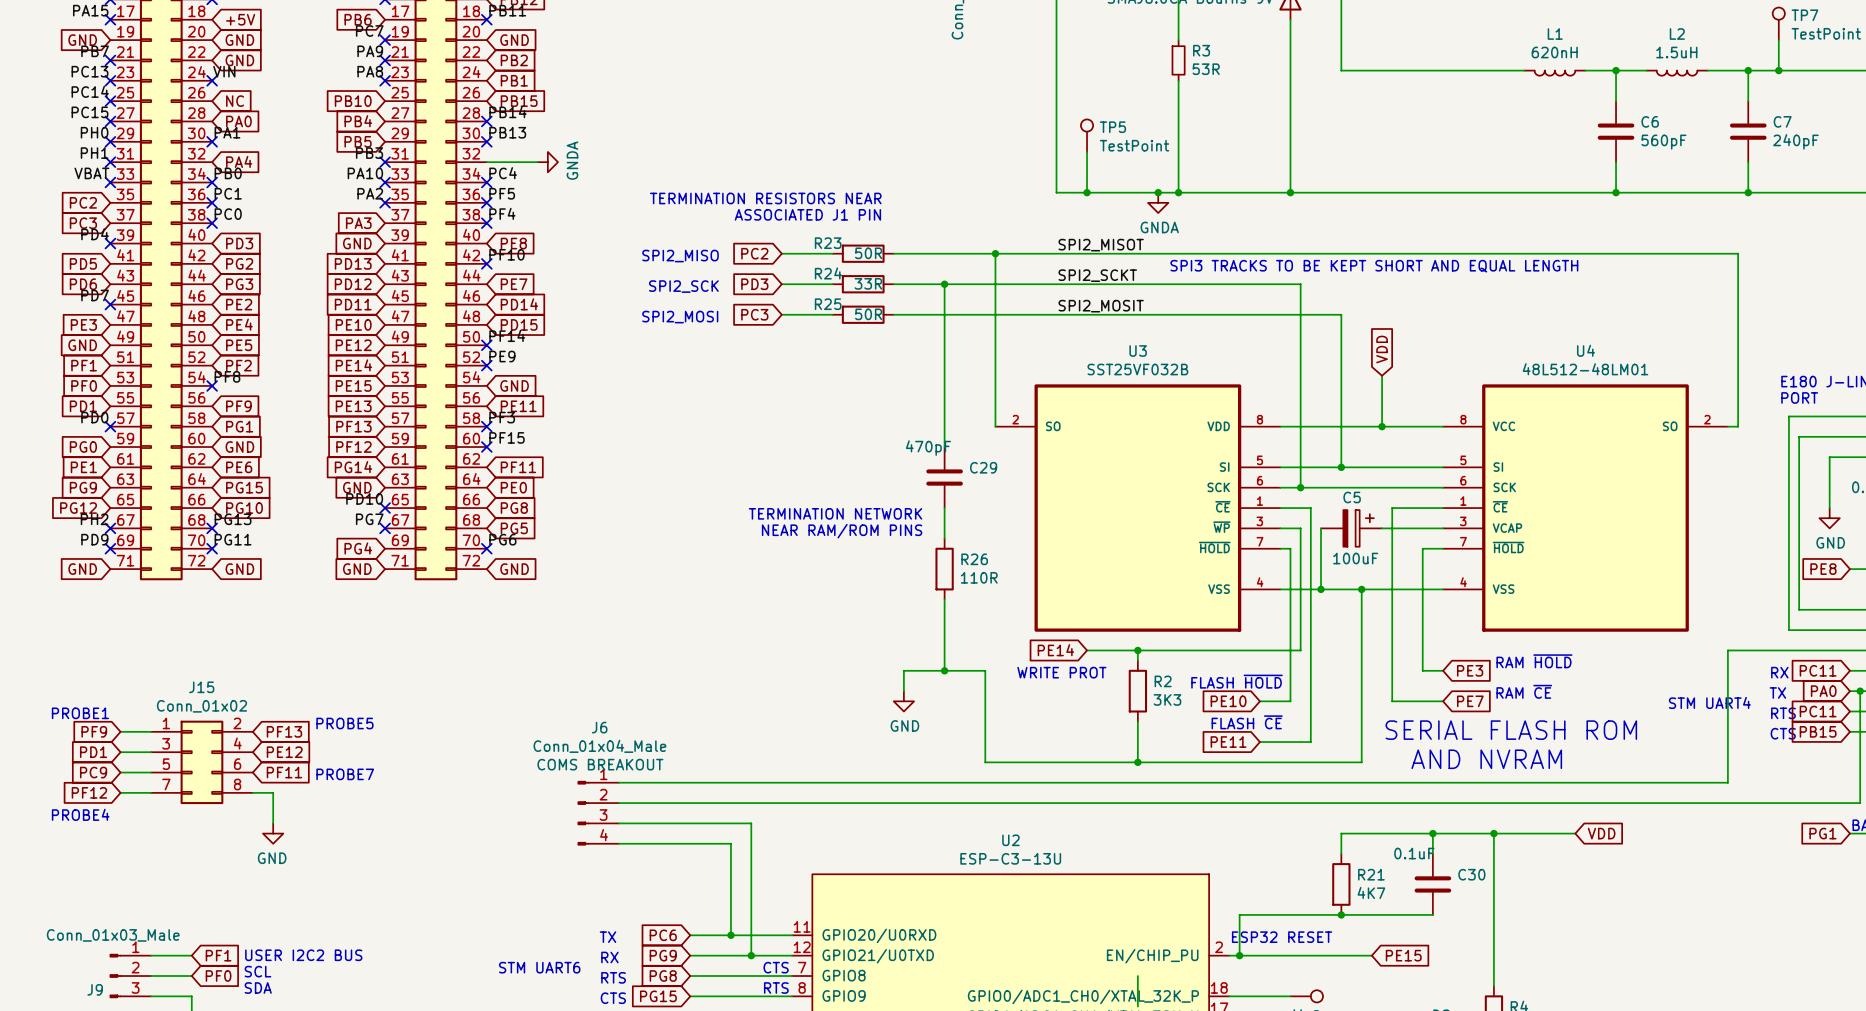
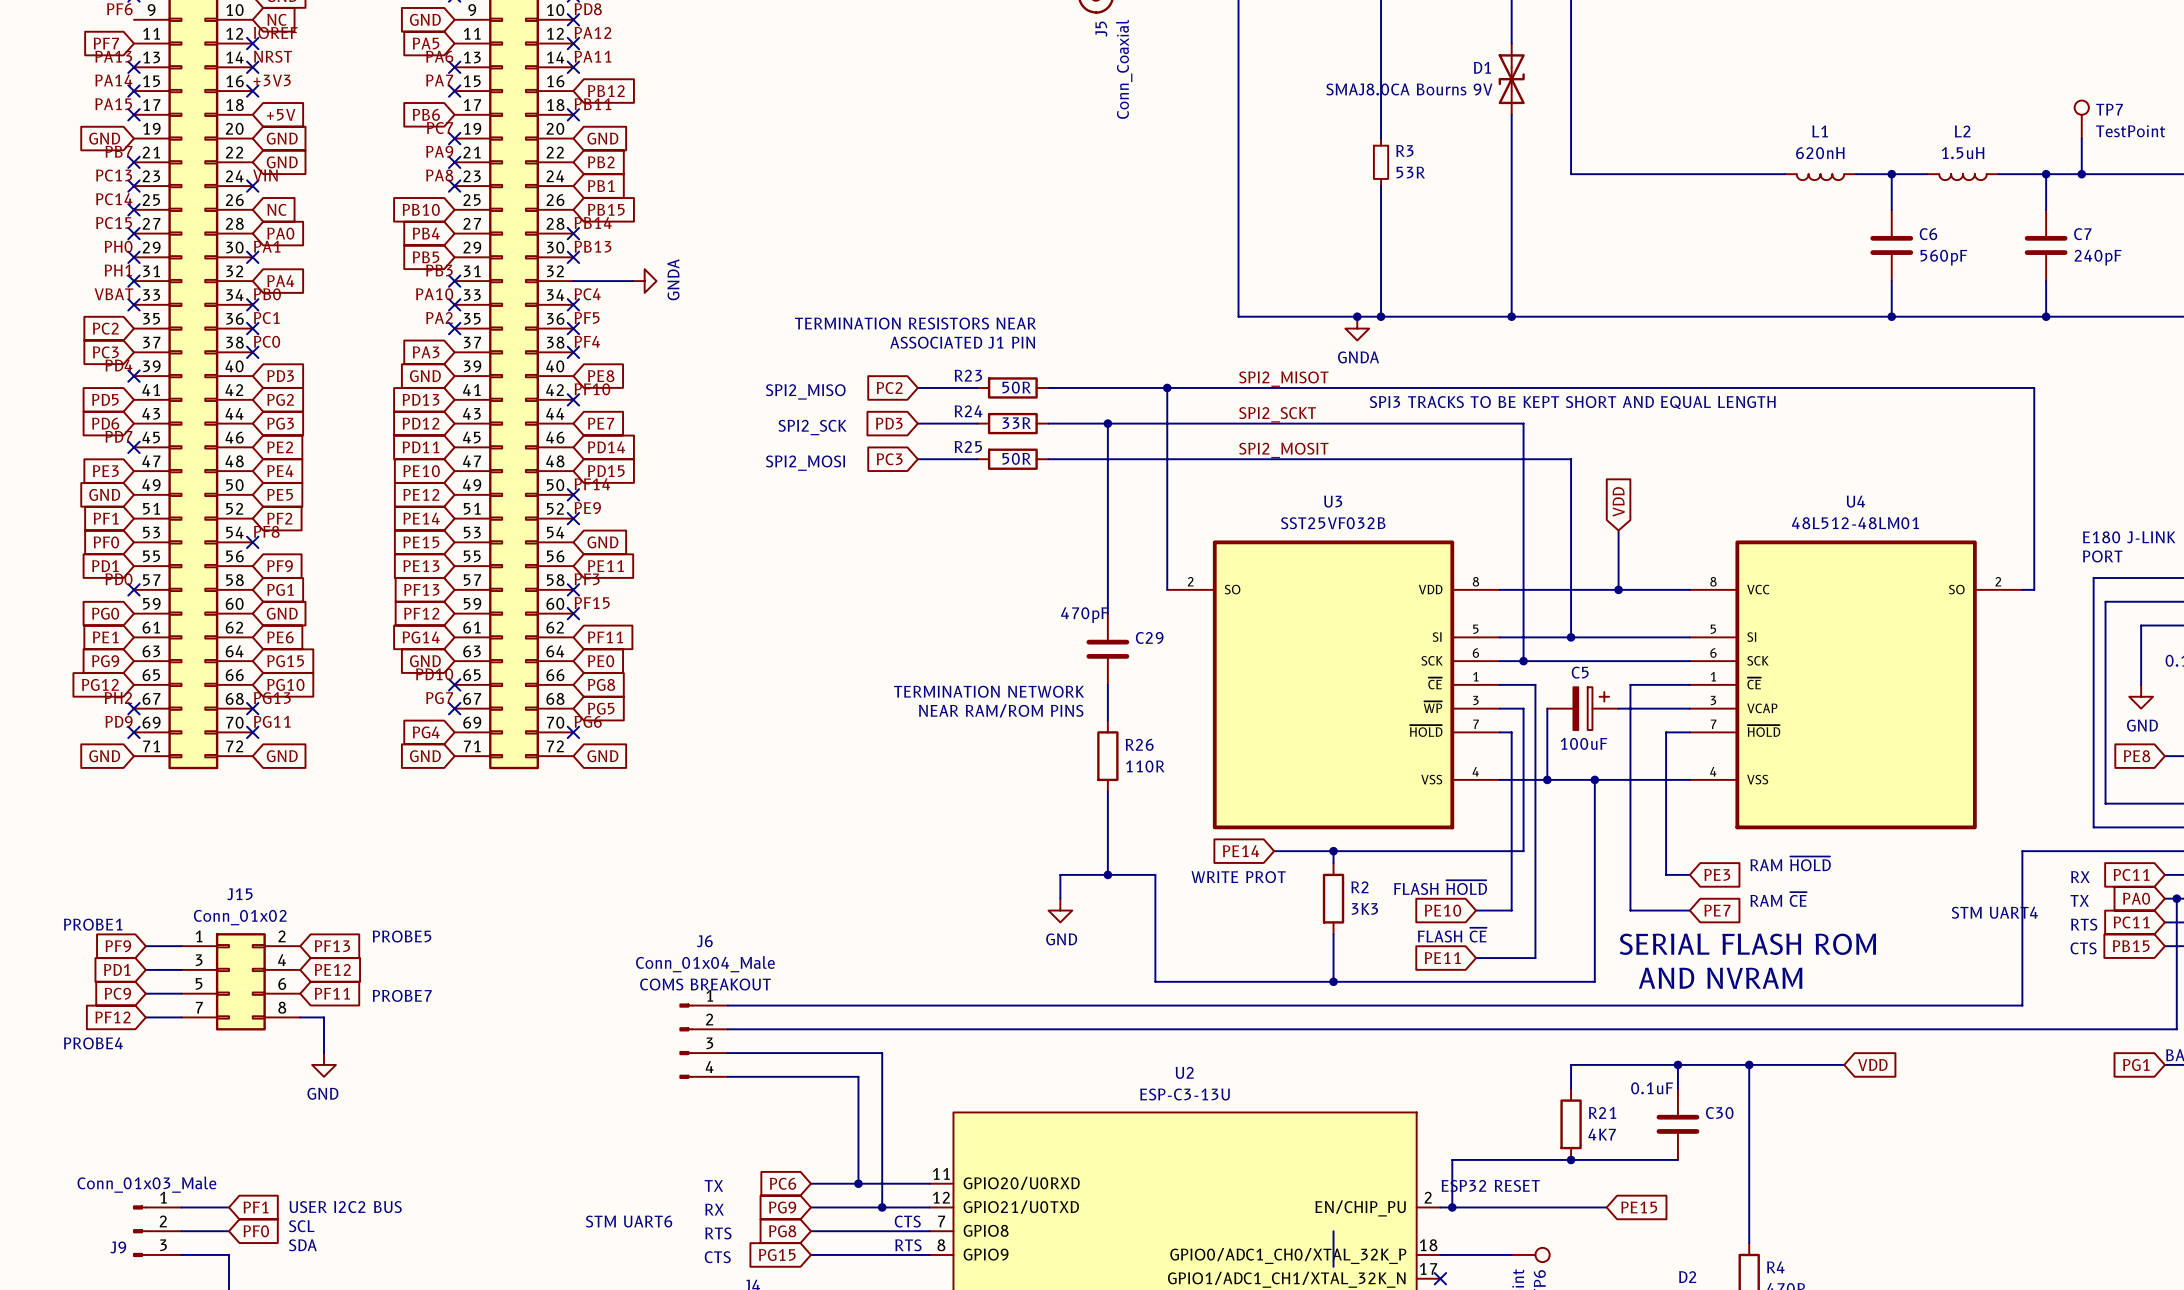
TP5: TestPoint (1087, 135) -> none
wire: (1087, 151) (1087, 192) -> none
junction: (1087, 192) -> none

